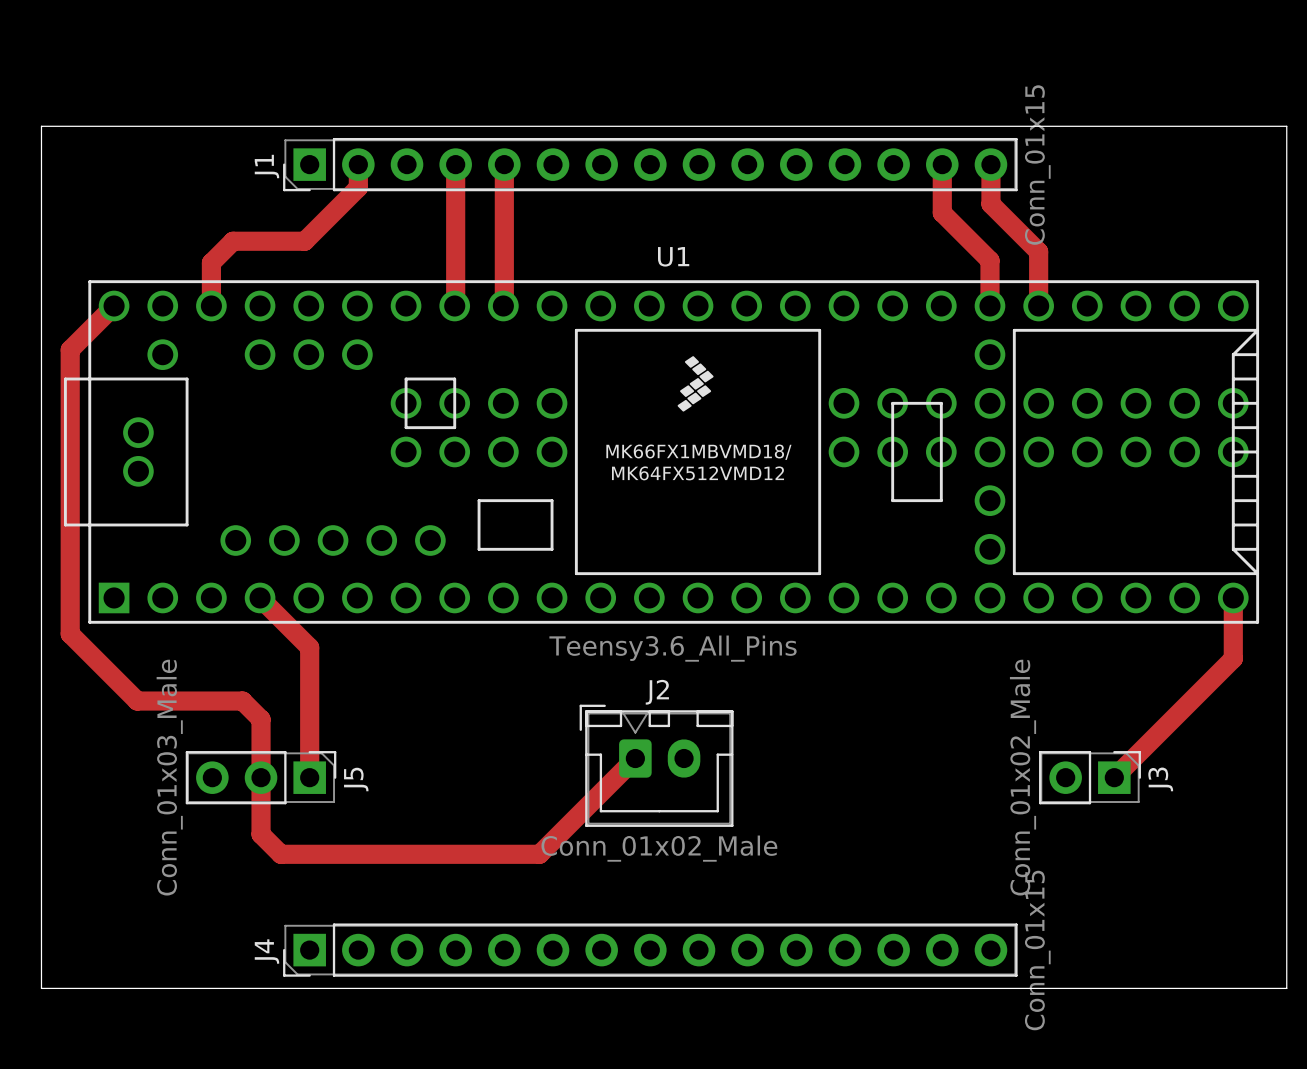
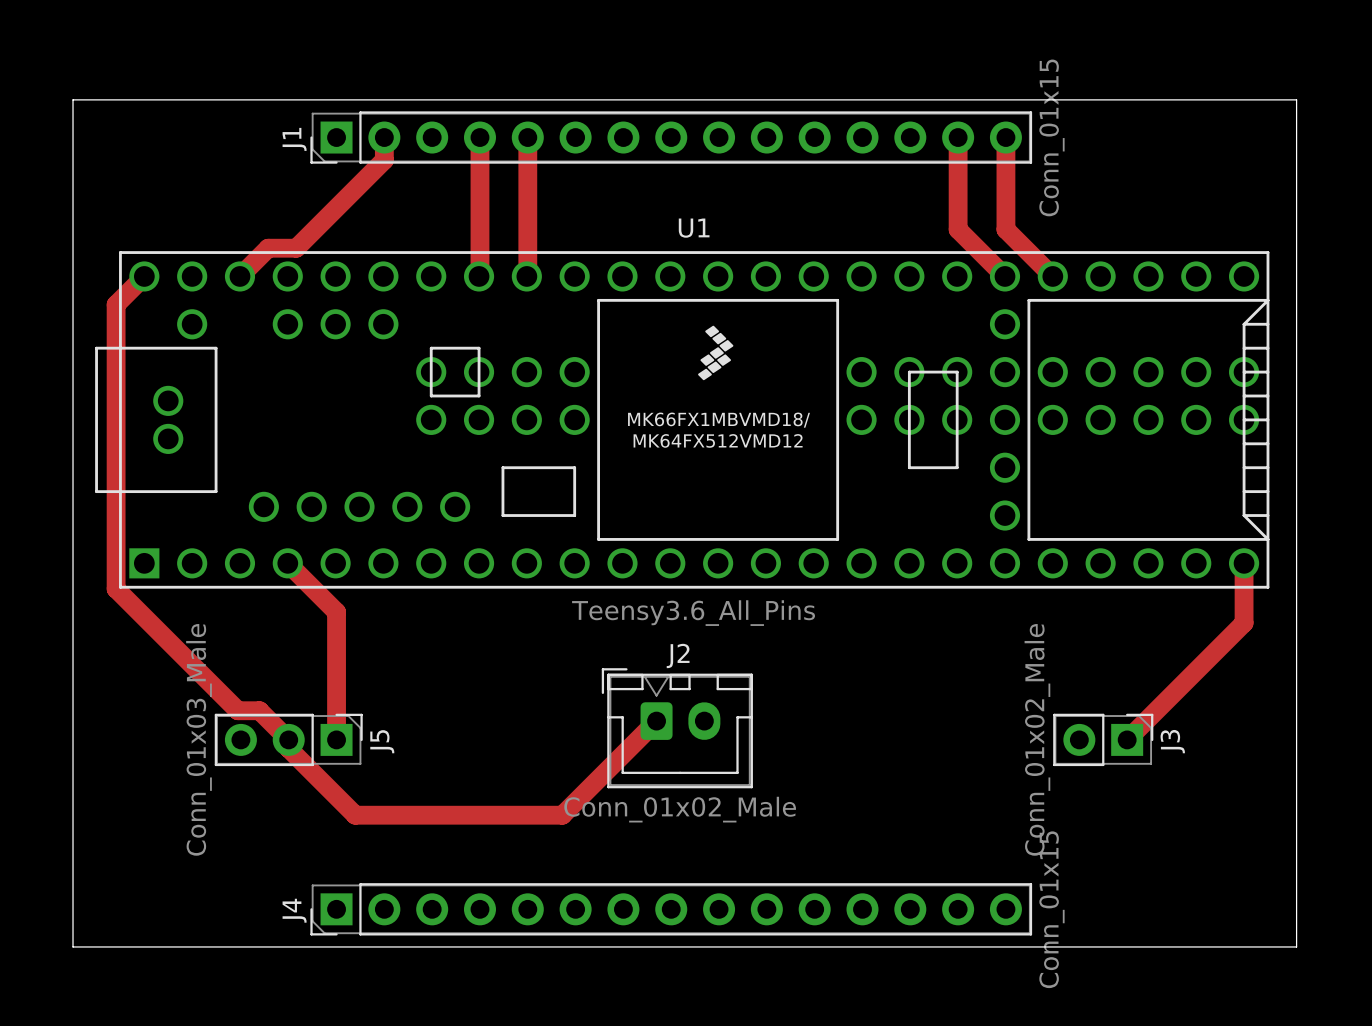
top track: (990, 204) (1038, 251) (1038, 306) -> (1005, 176) (1005, 229) (1052, 276)
top track: (942, 212) (989, 260) (989, 306) -> (958, 184) (958, 229) (1005, 276)
top track: (304, 241) (233, 241) (211, 262) (211, 306) -> (331, 212) (296, 248) (268, 248) (239, 276)
top track: (85, 334) (70, 349) (70, 633) (137, 701) (242, 701) (261, 719) (261, 777) -> (116, 304) (116, 588) (237, 710) (259, 710) (288, 739)
top track: (261, 786) (261, 834) (280, 854) (328, 854) -> (288, 748) (355, 815)

